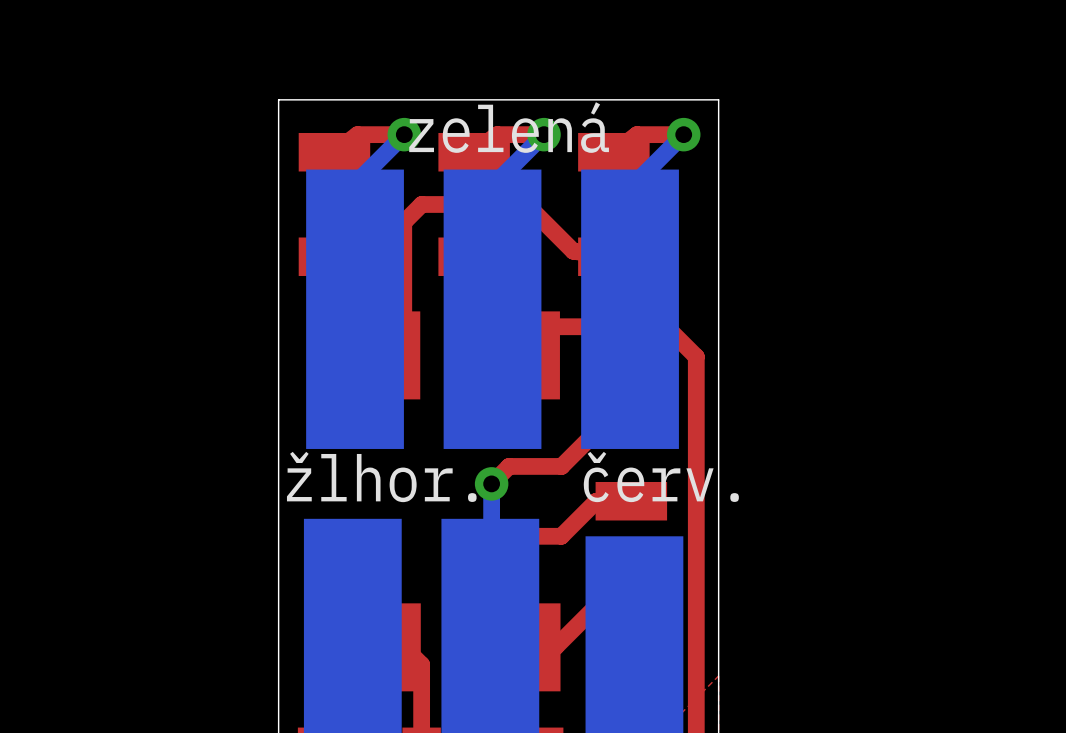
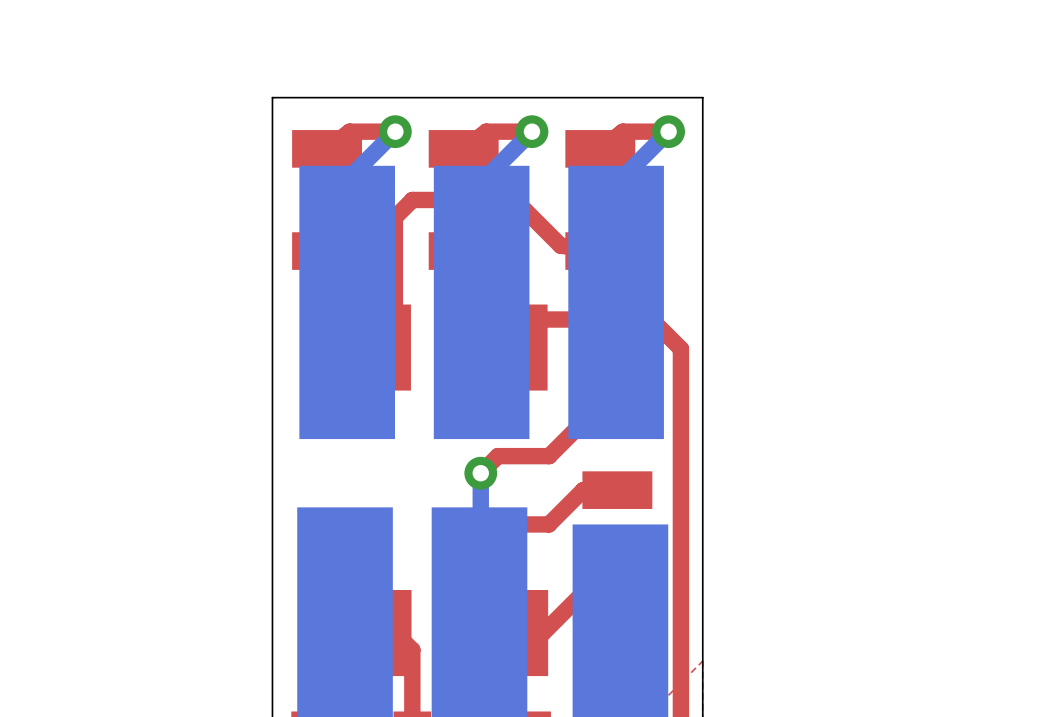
text: zelená (509, 127) -> none
text: žlhor. (381, 477) -> none
text: červ. (661, 477) -> none

